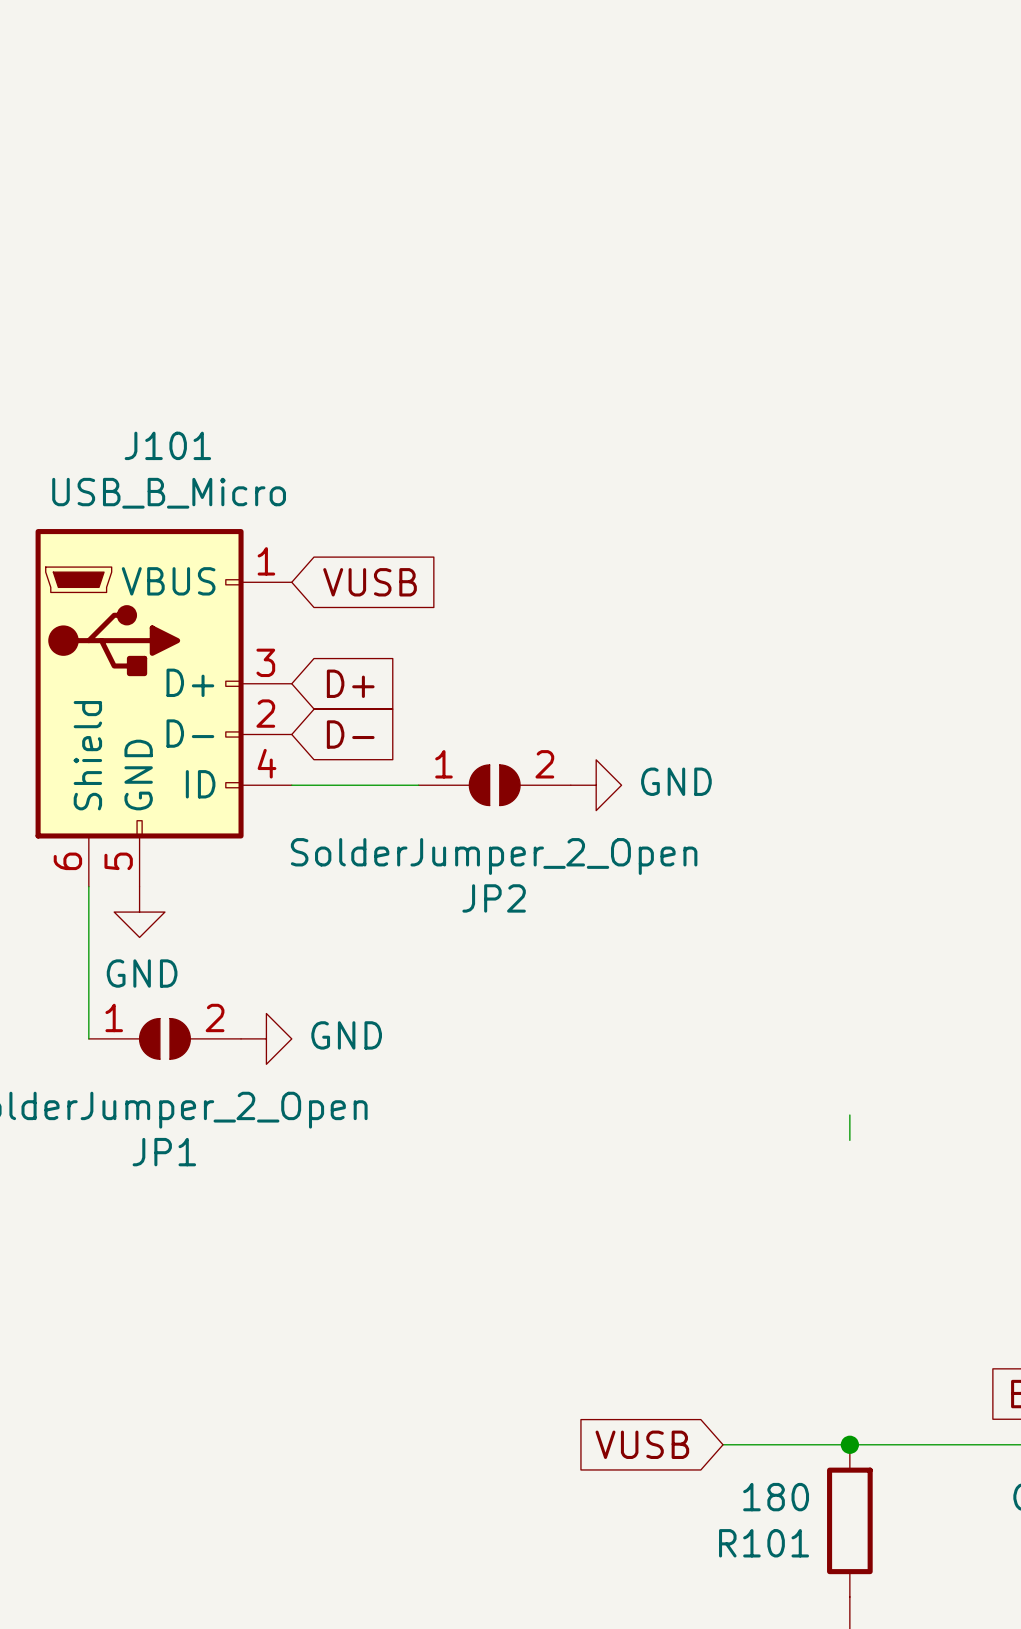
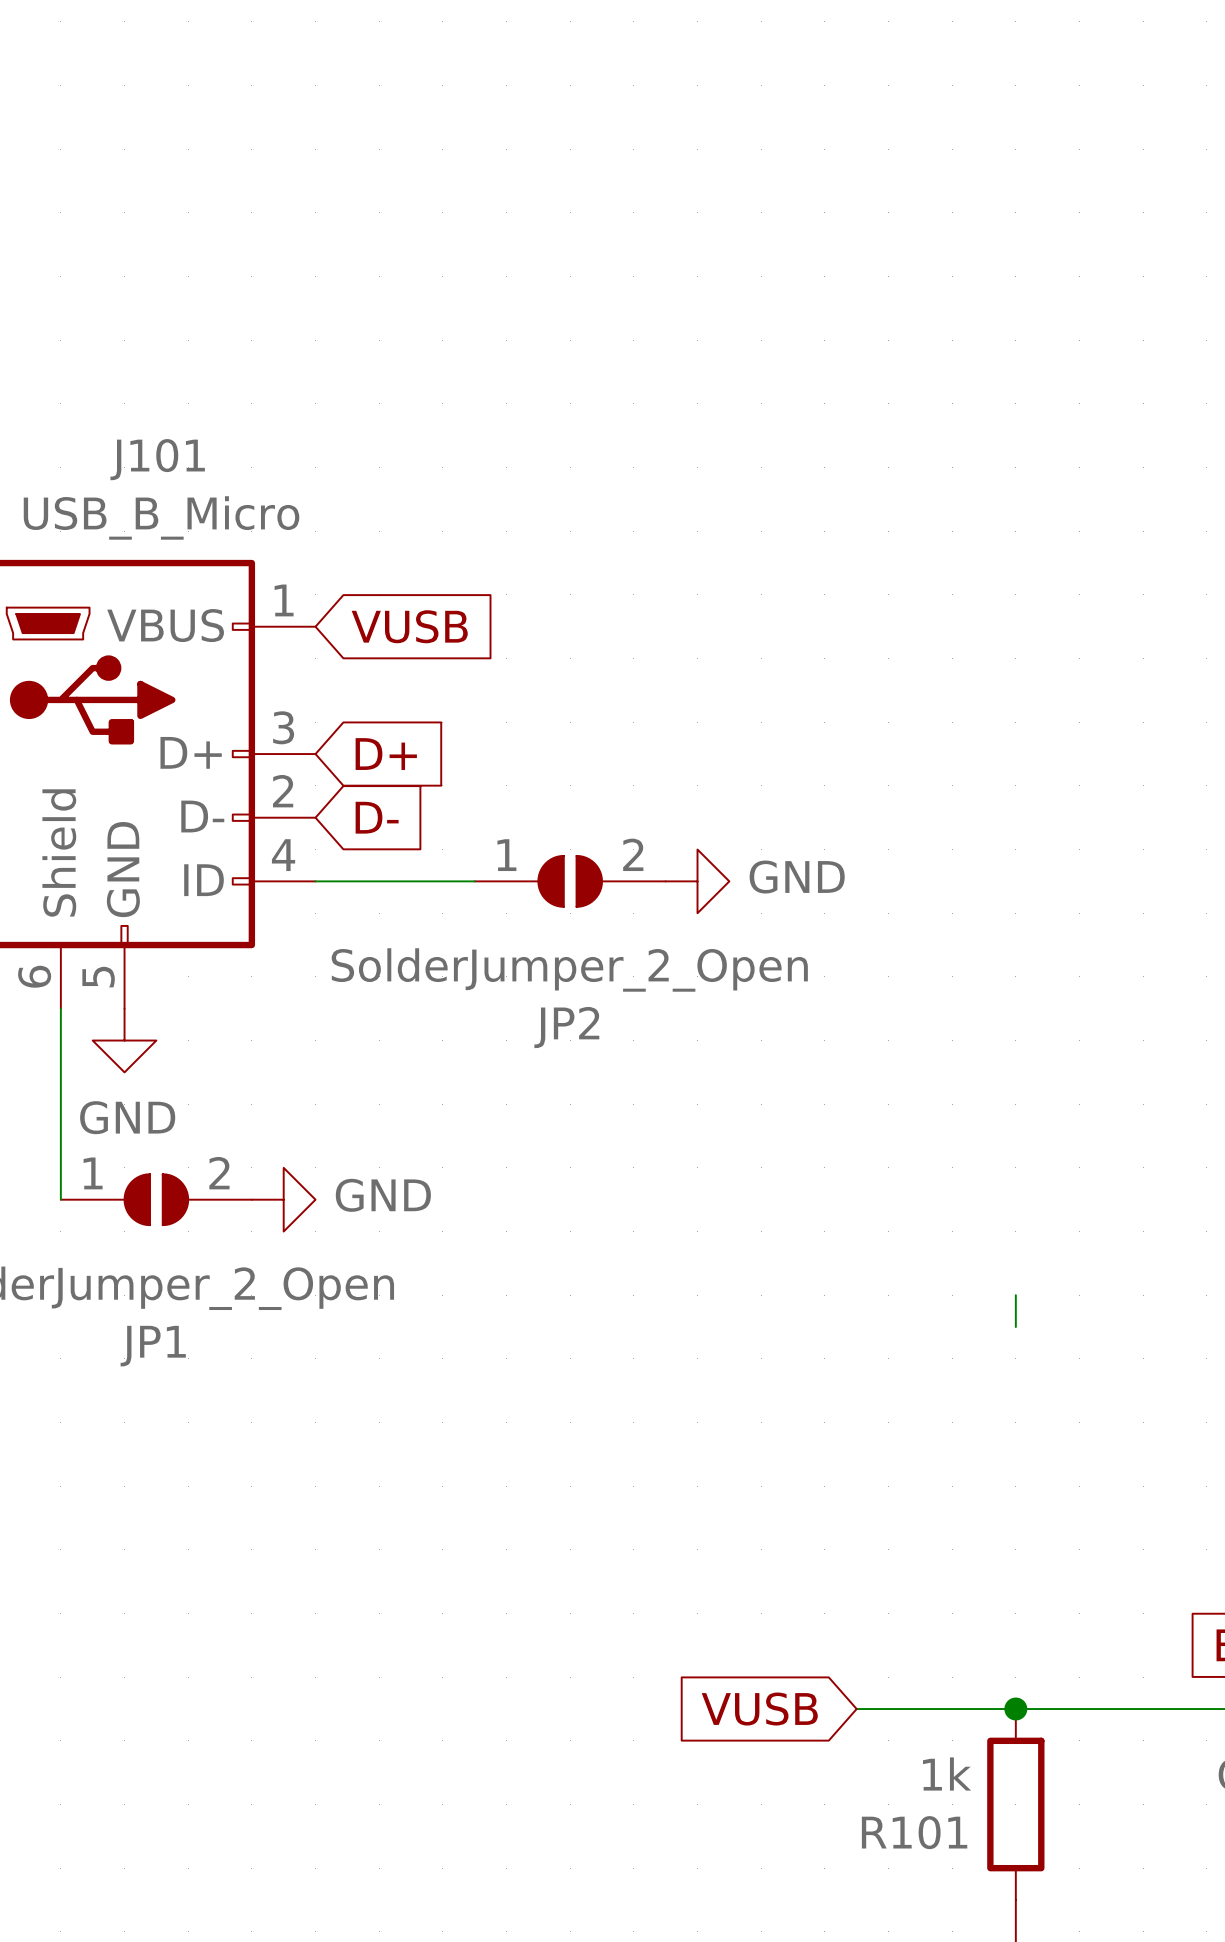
R101 value: 180 (776, 1497) -> 1k (947, 1773)

